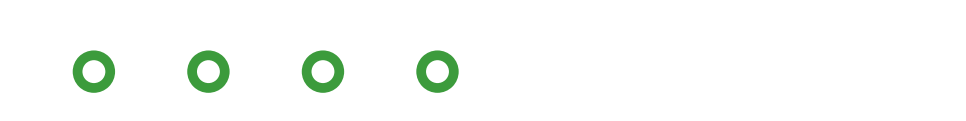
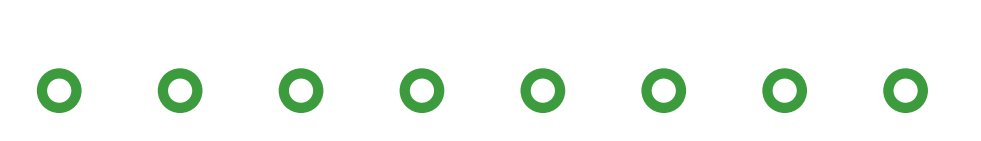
part: none -> (542, 90)
part: none -> (663, 90)
part: none -> (784, 90)
part: none -> (905, 90)

